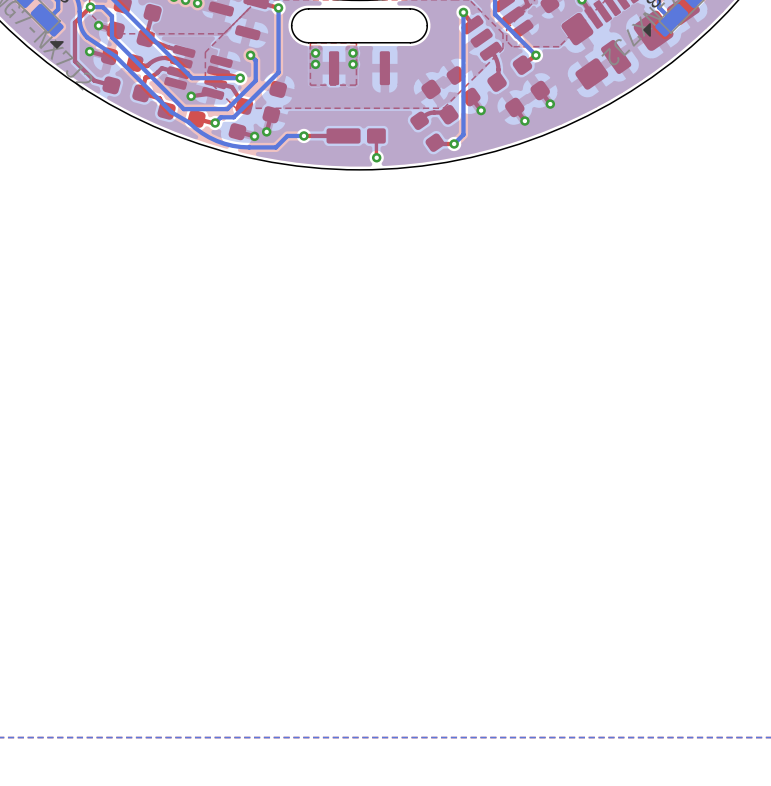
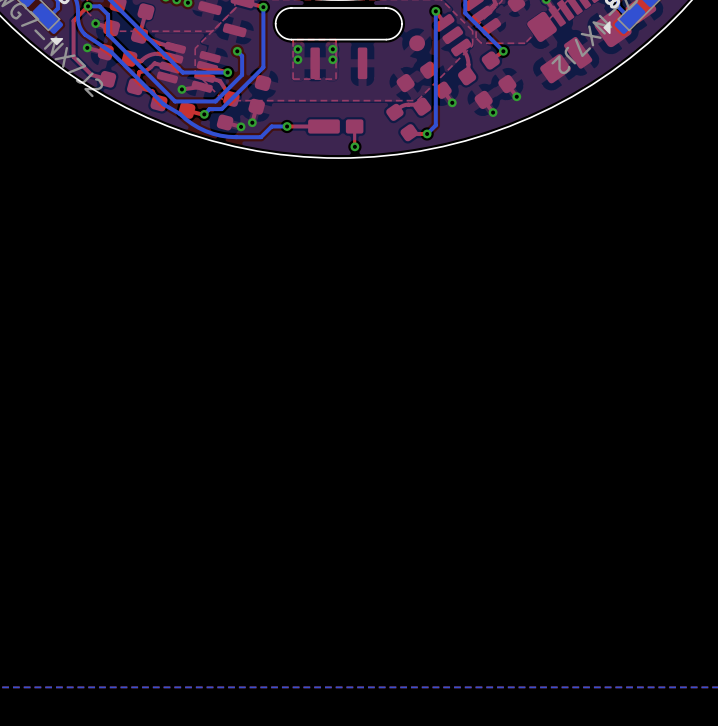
part: none -> (417, 43)

